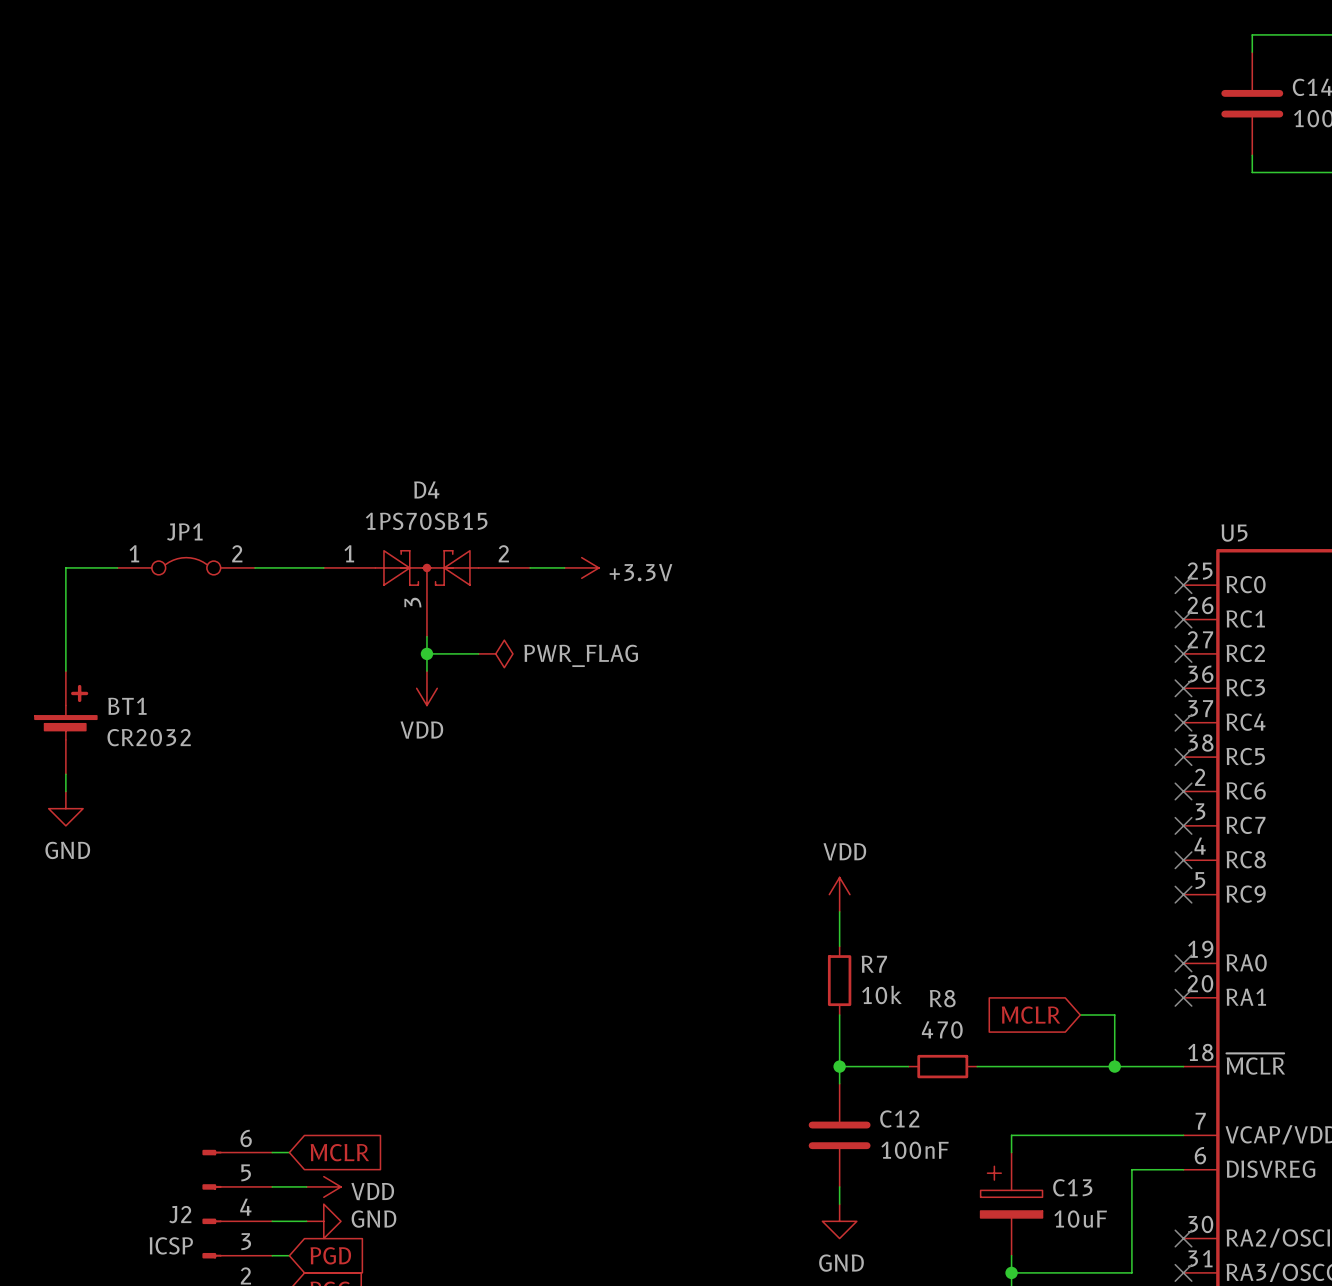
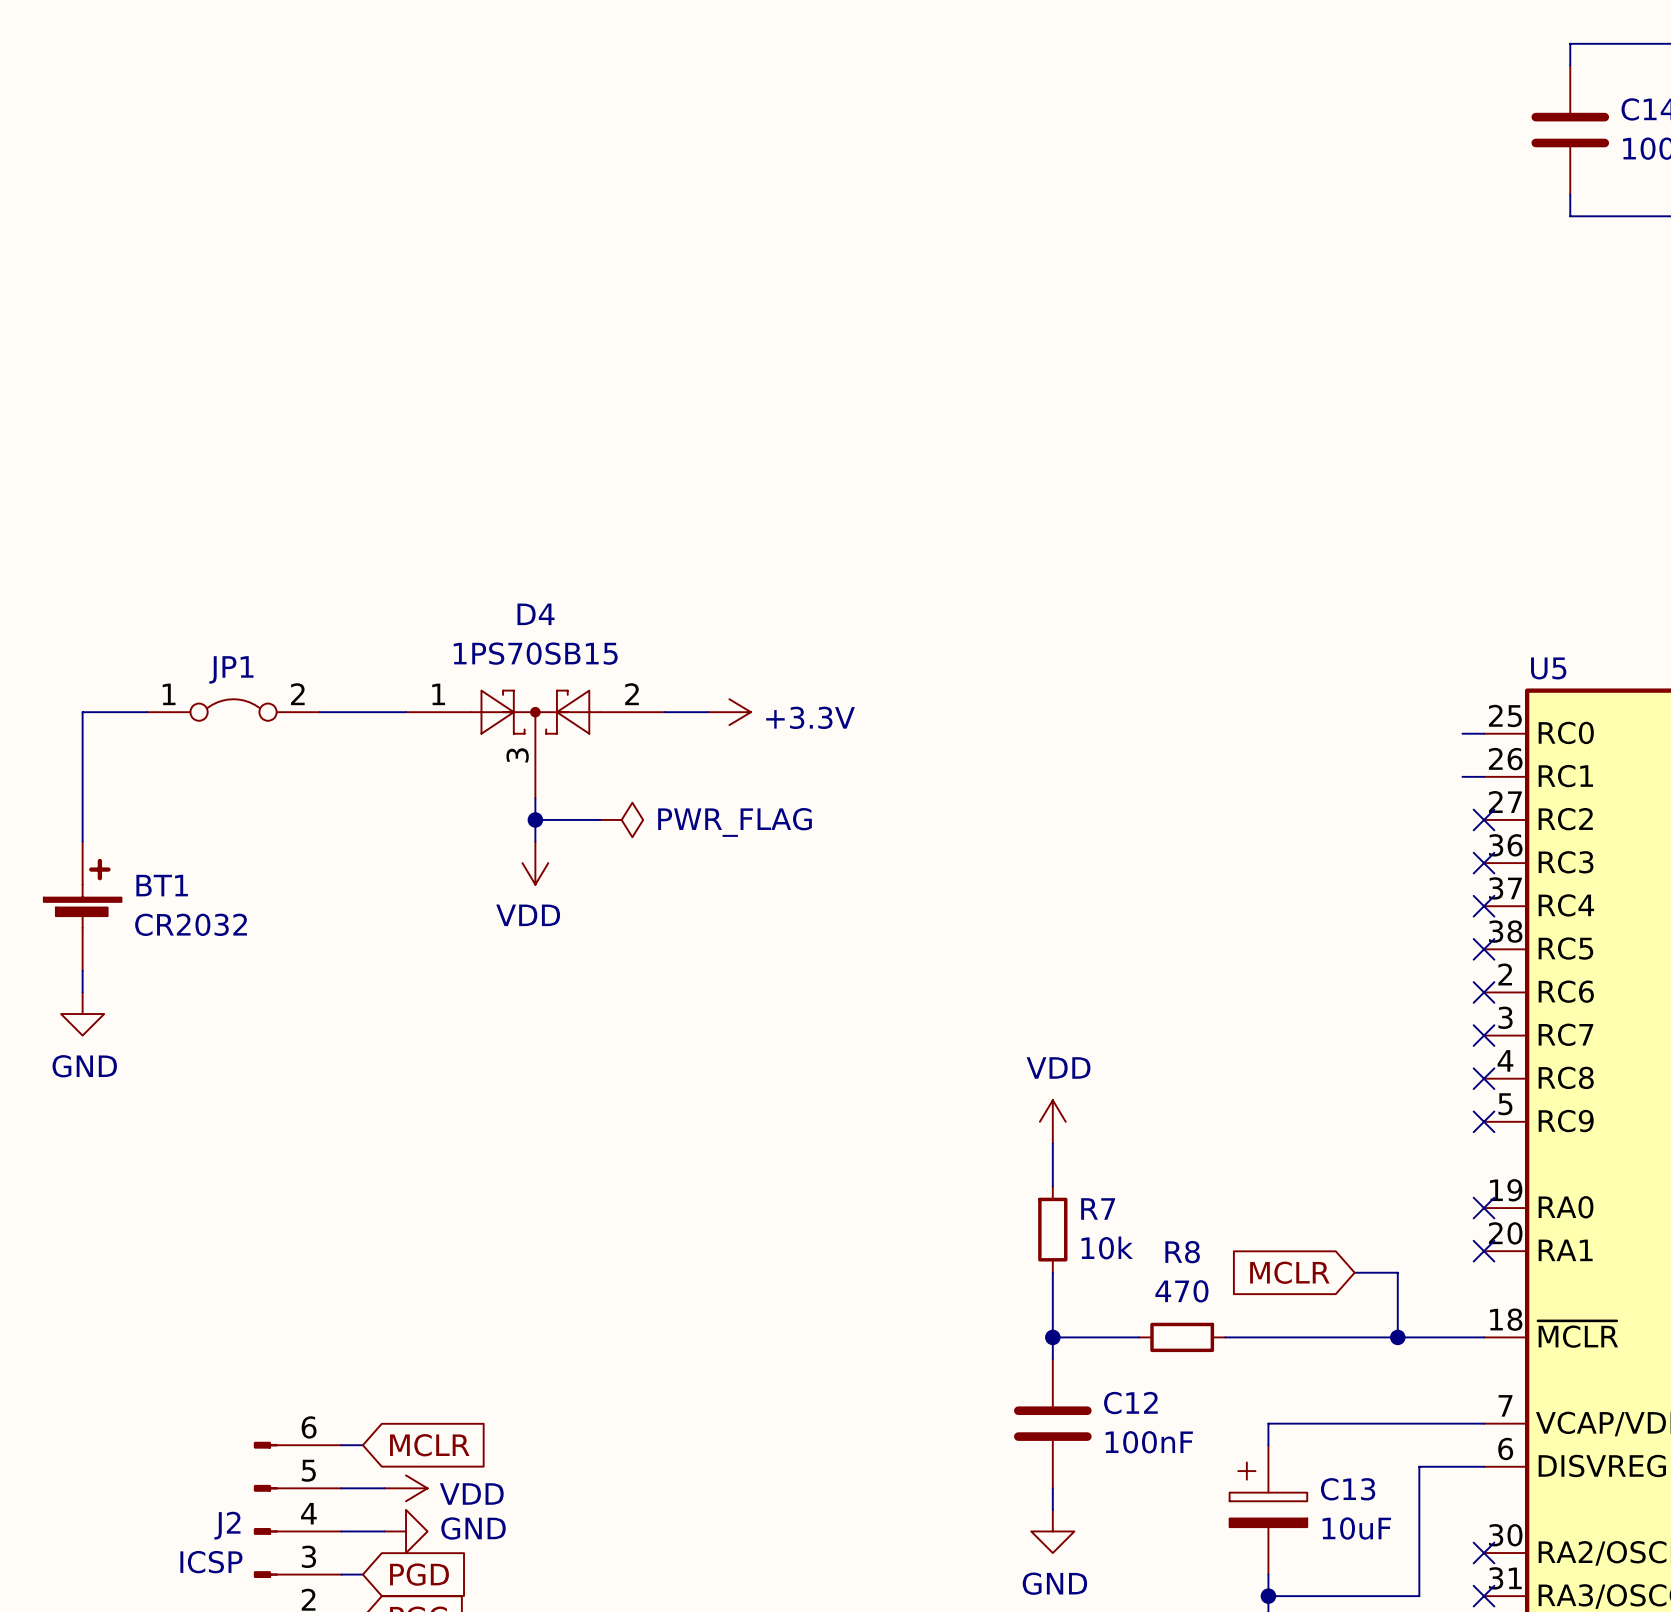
wire: none -> (1462, 733) (1484, 733)
no-connect mark: (1183, 585) -> none
wire: none -> (1462, 776) (1484, 776)
no-connect mark: (1183, 619) -> none

